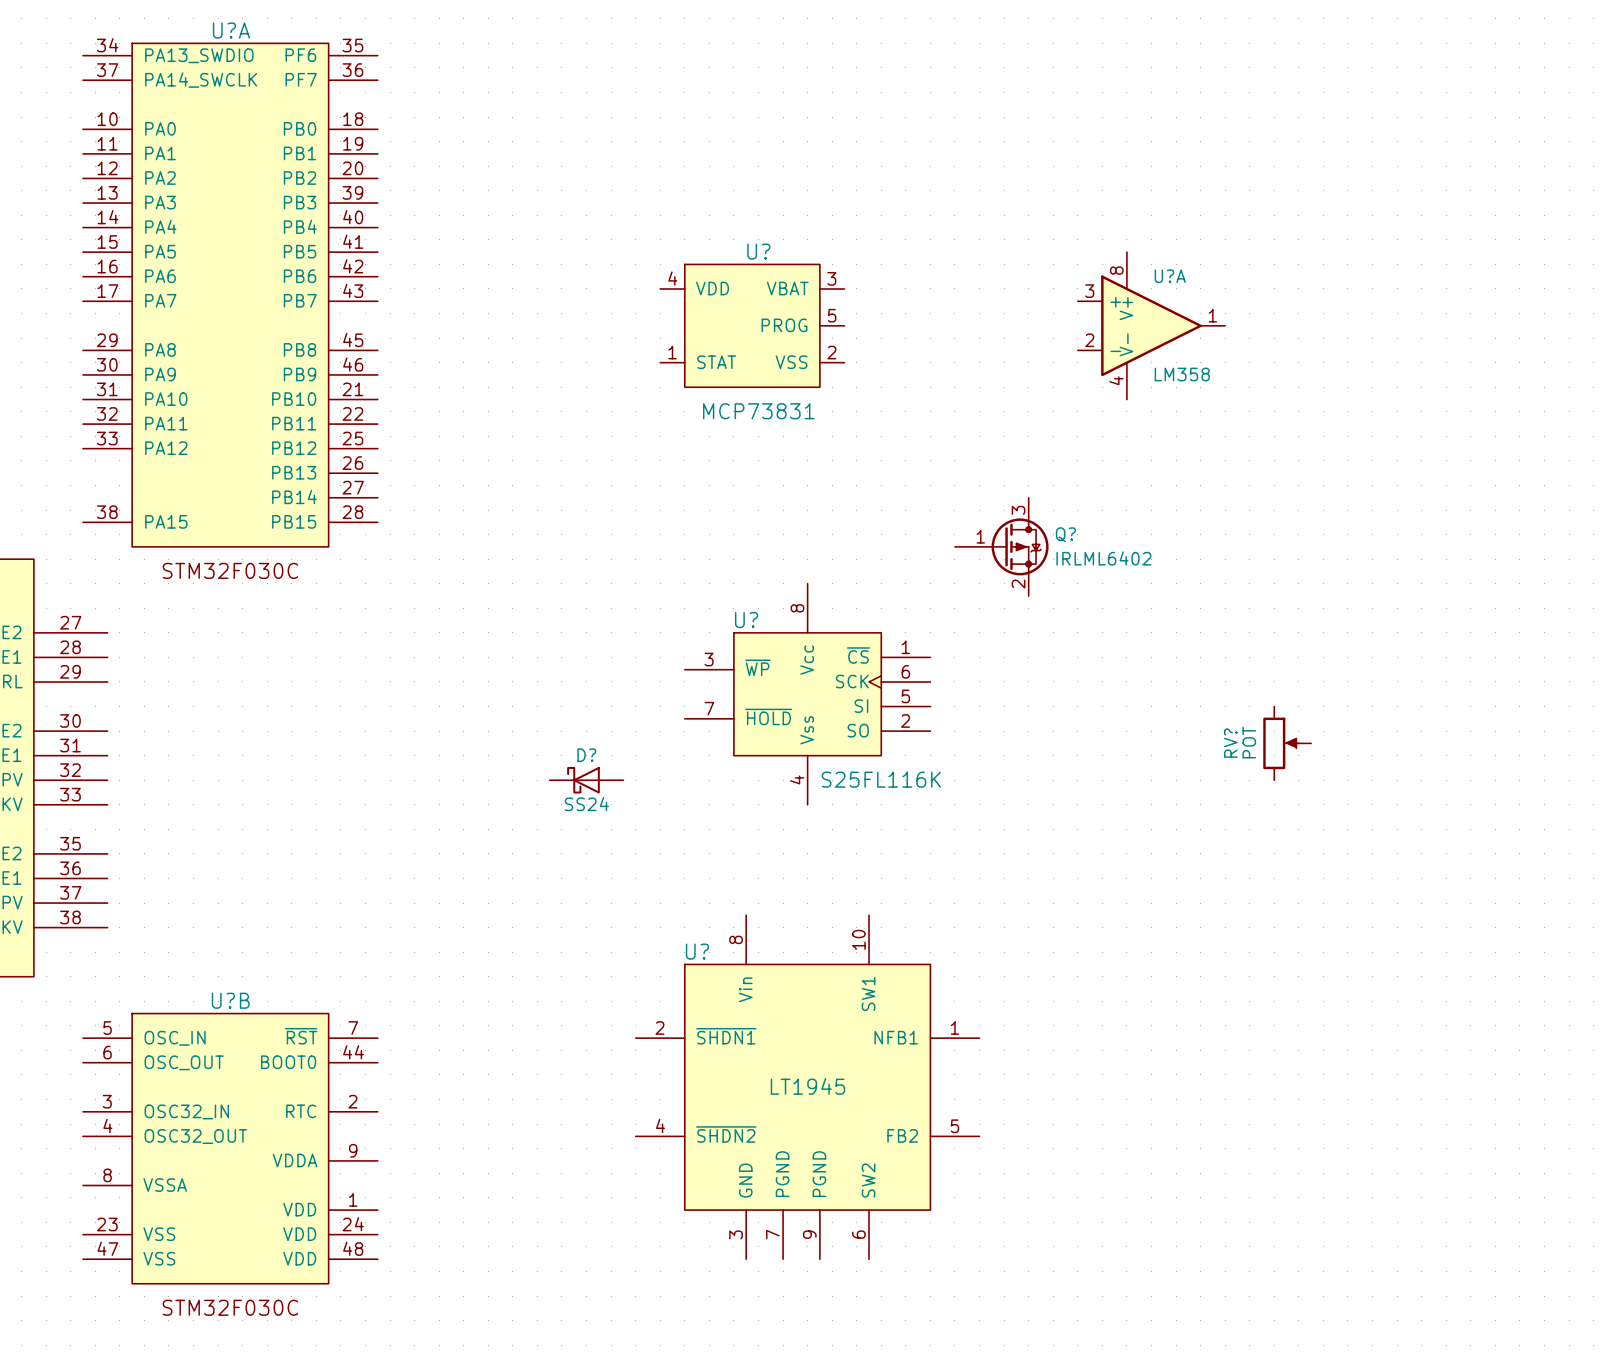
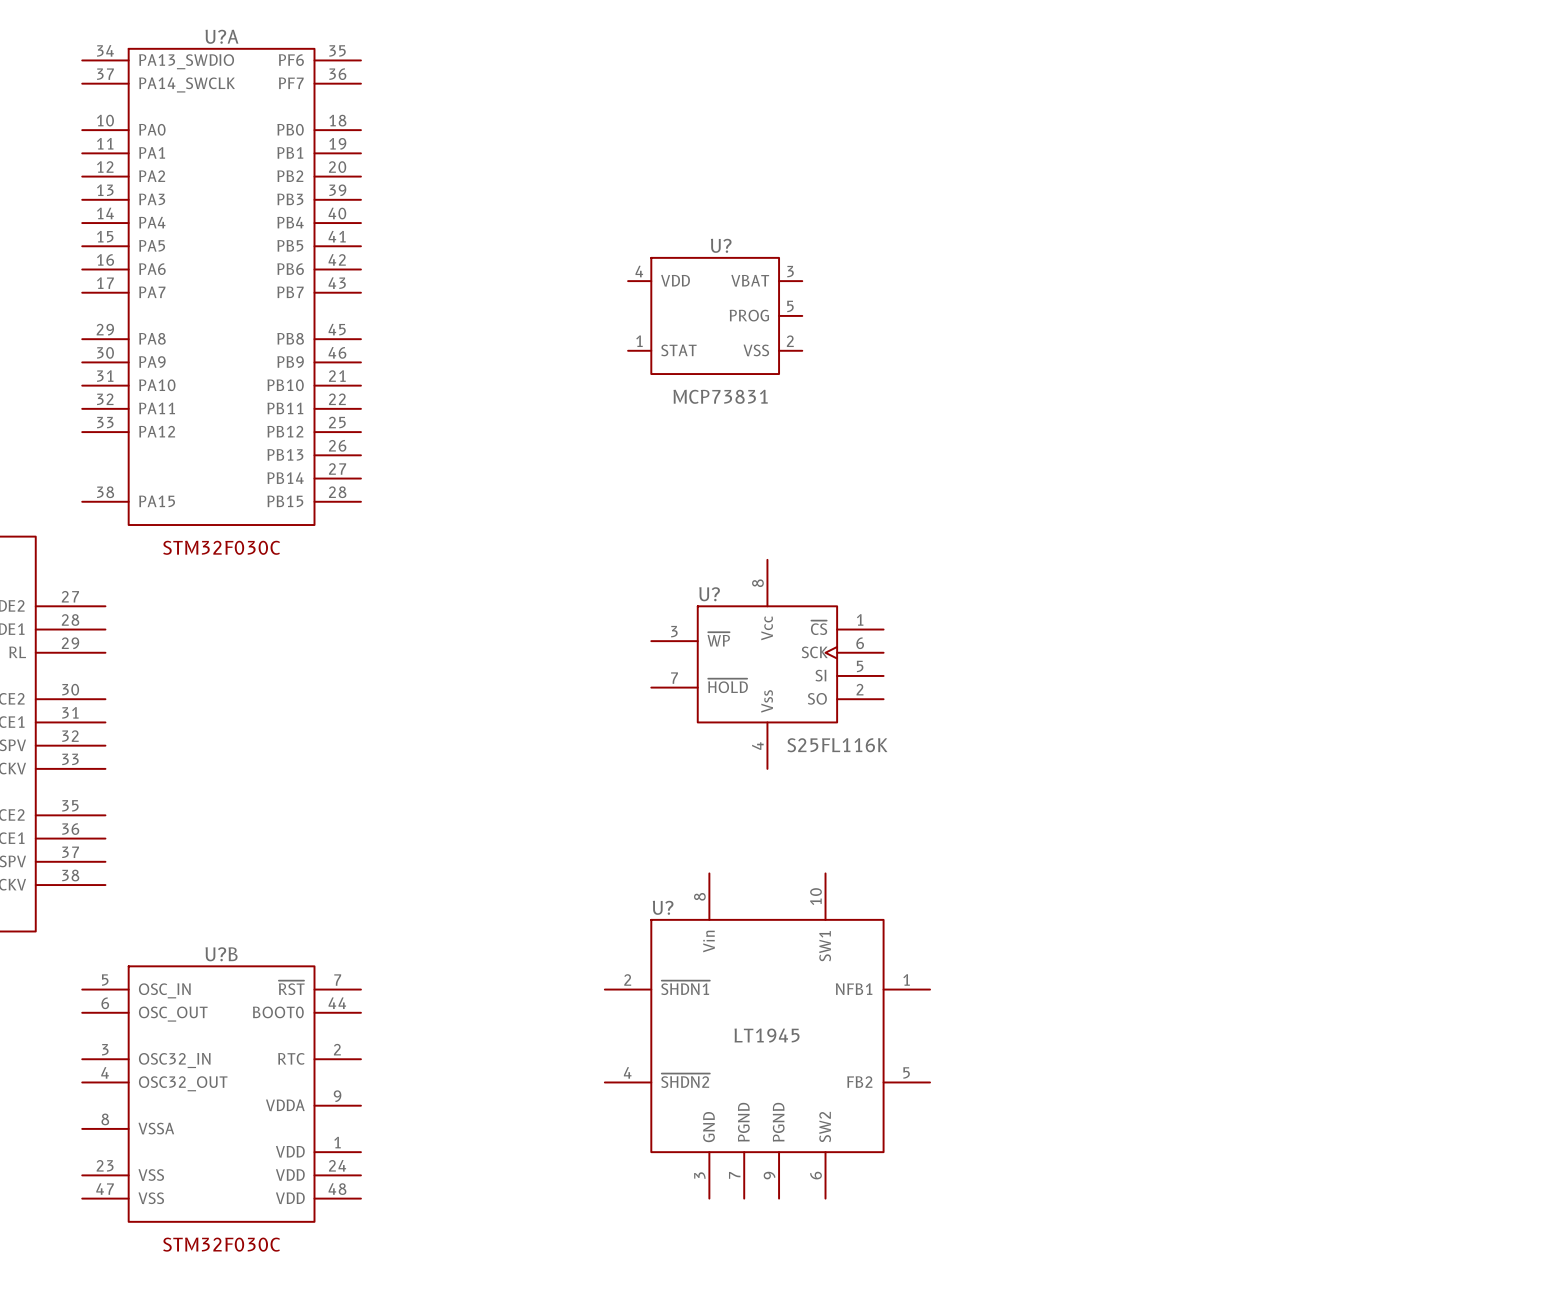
U?A: LM358 (1151, 325) -> none
Q?: IRLML6402 (1001, 546) -> none
RV?: POT (1287, 743) -> none
D?: SS24 (586, 780) -> none

